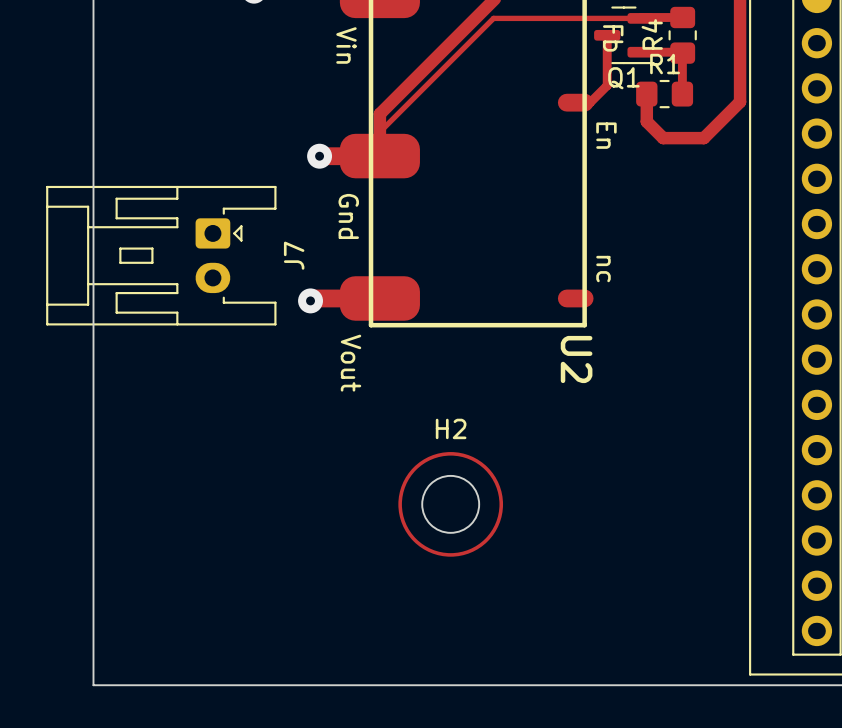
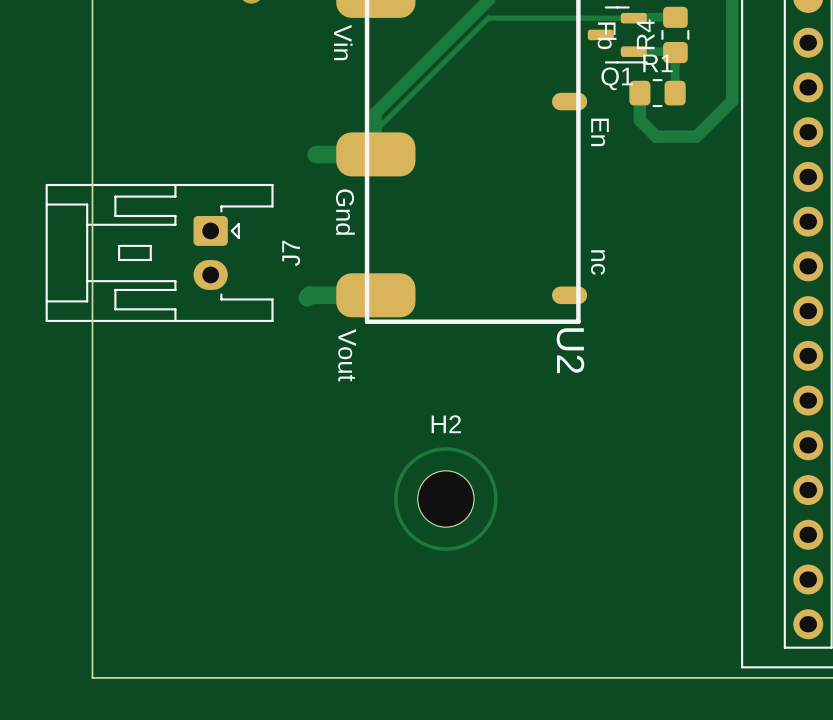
track: (607, 35) (607, 85) (590, 102) (575, 102) -> none
via: (319, 156) -> none
via: (310, 300) -> none

